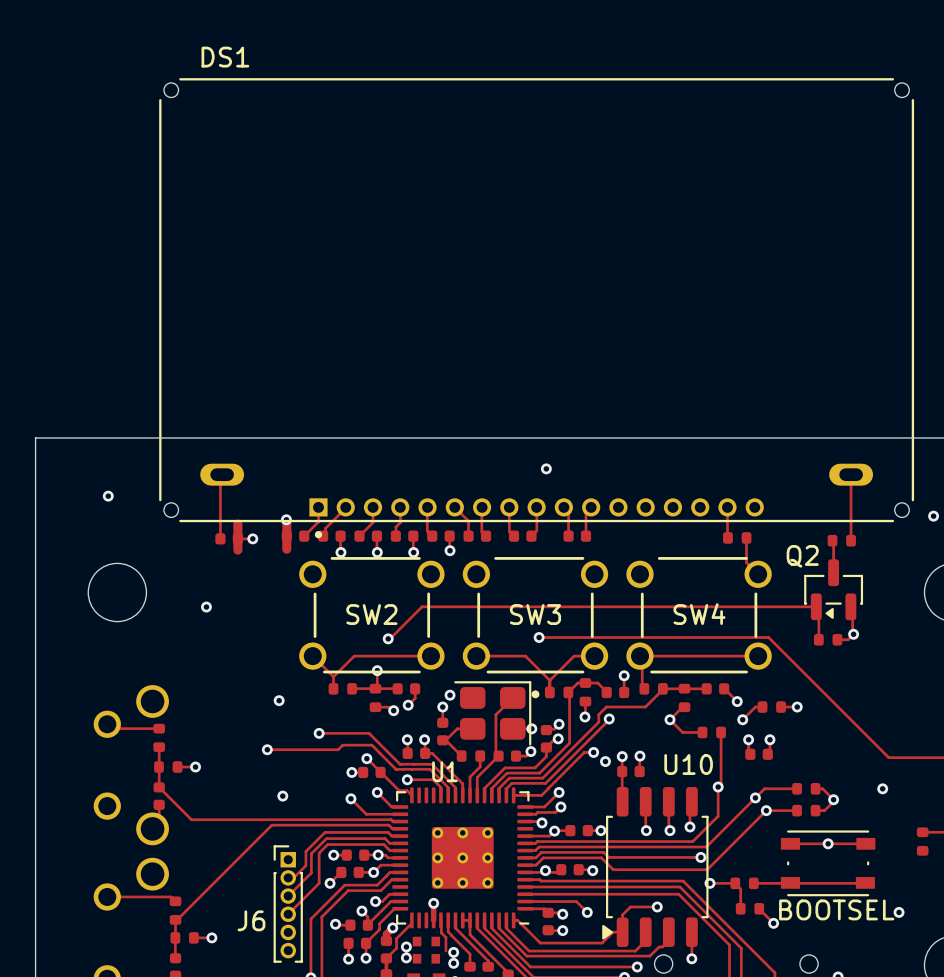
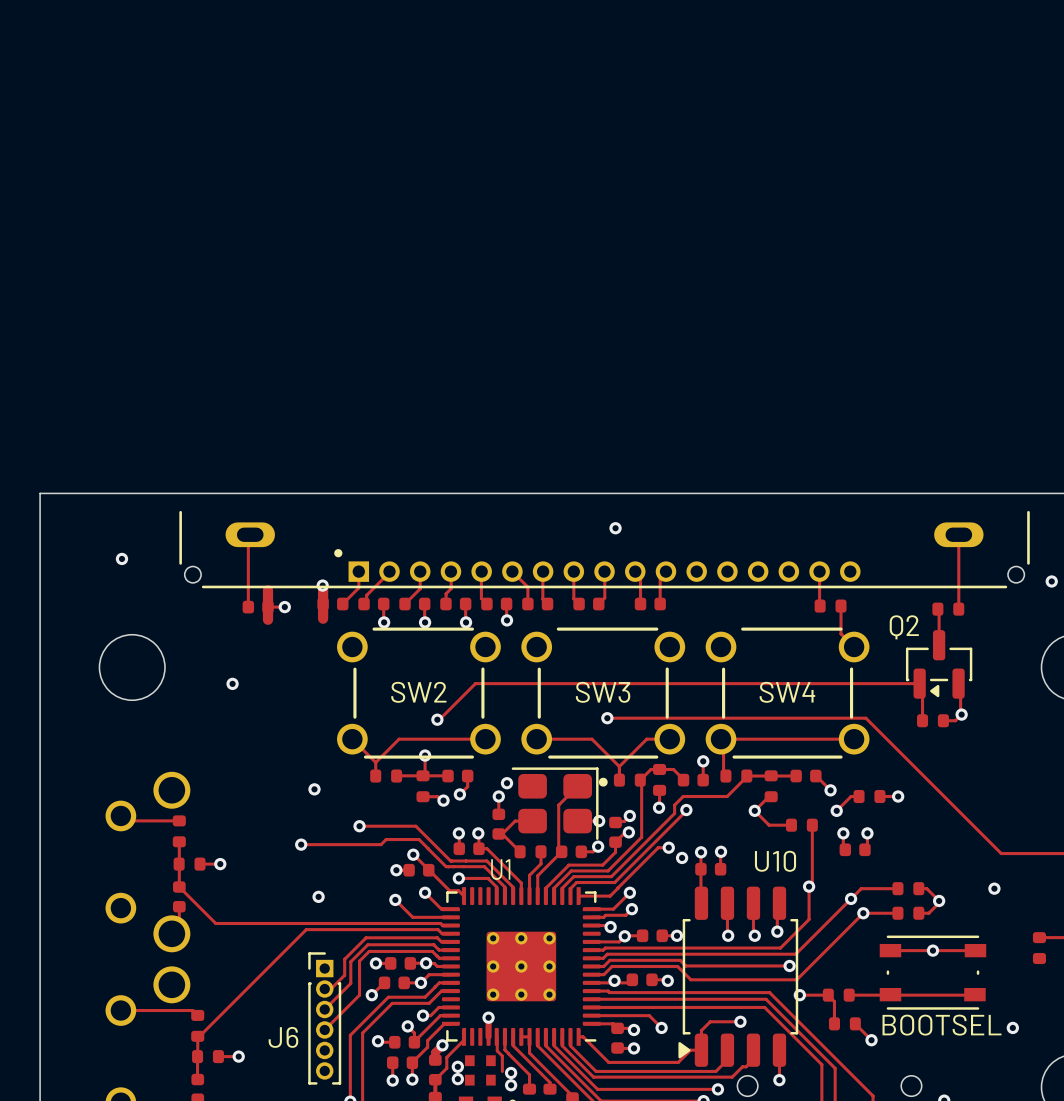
DS1: (536, 308) -> none
part: none -> (604, 549)

